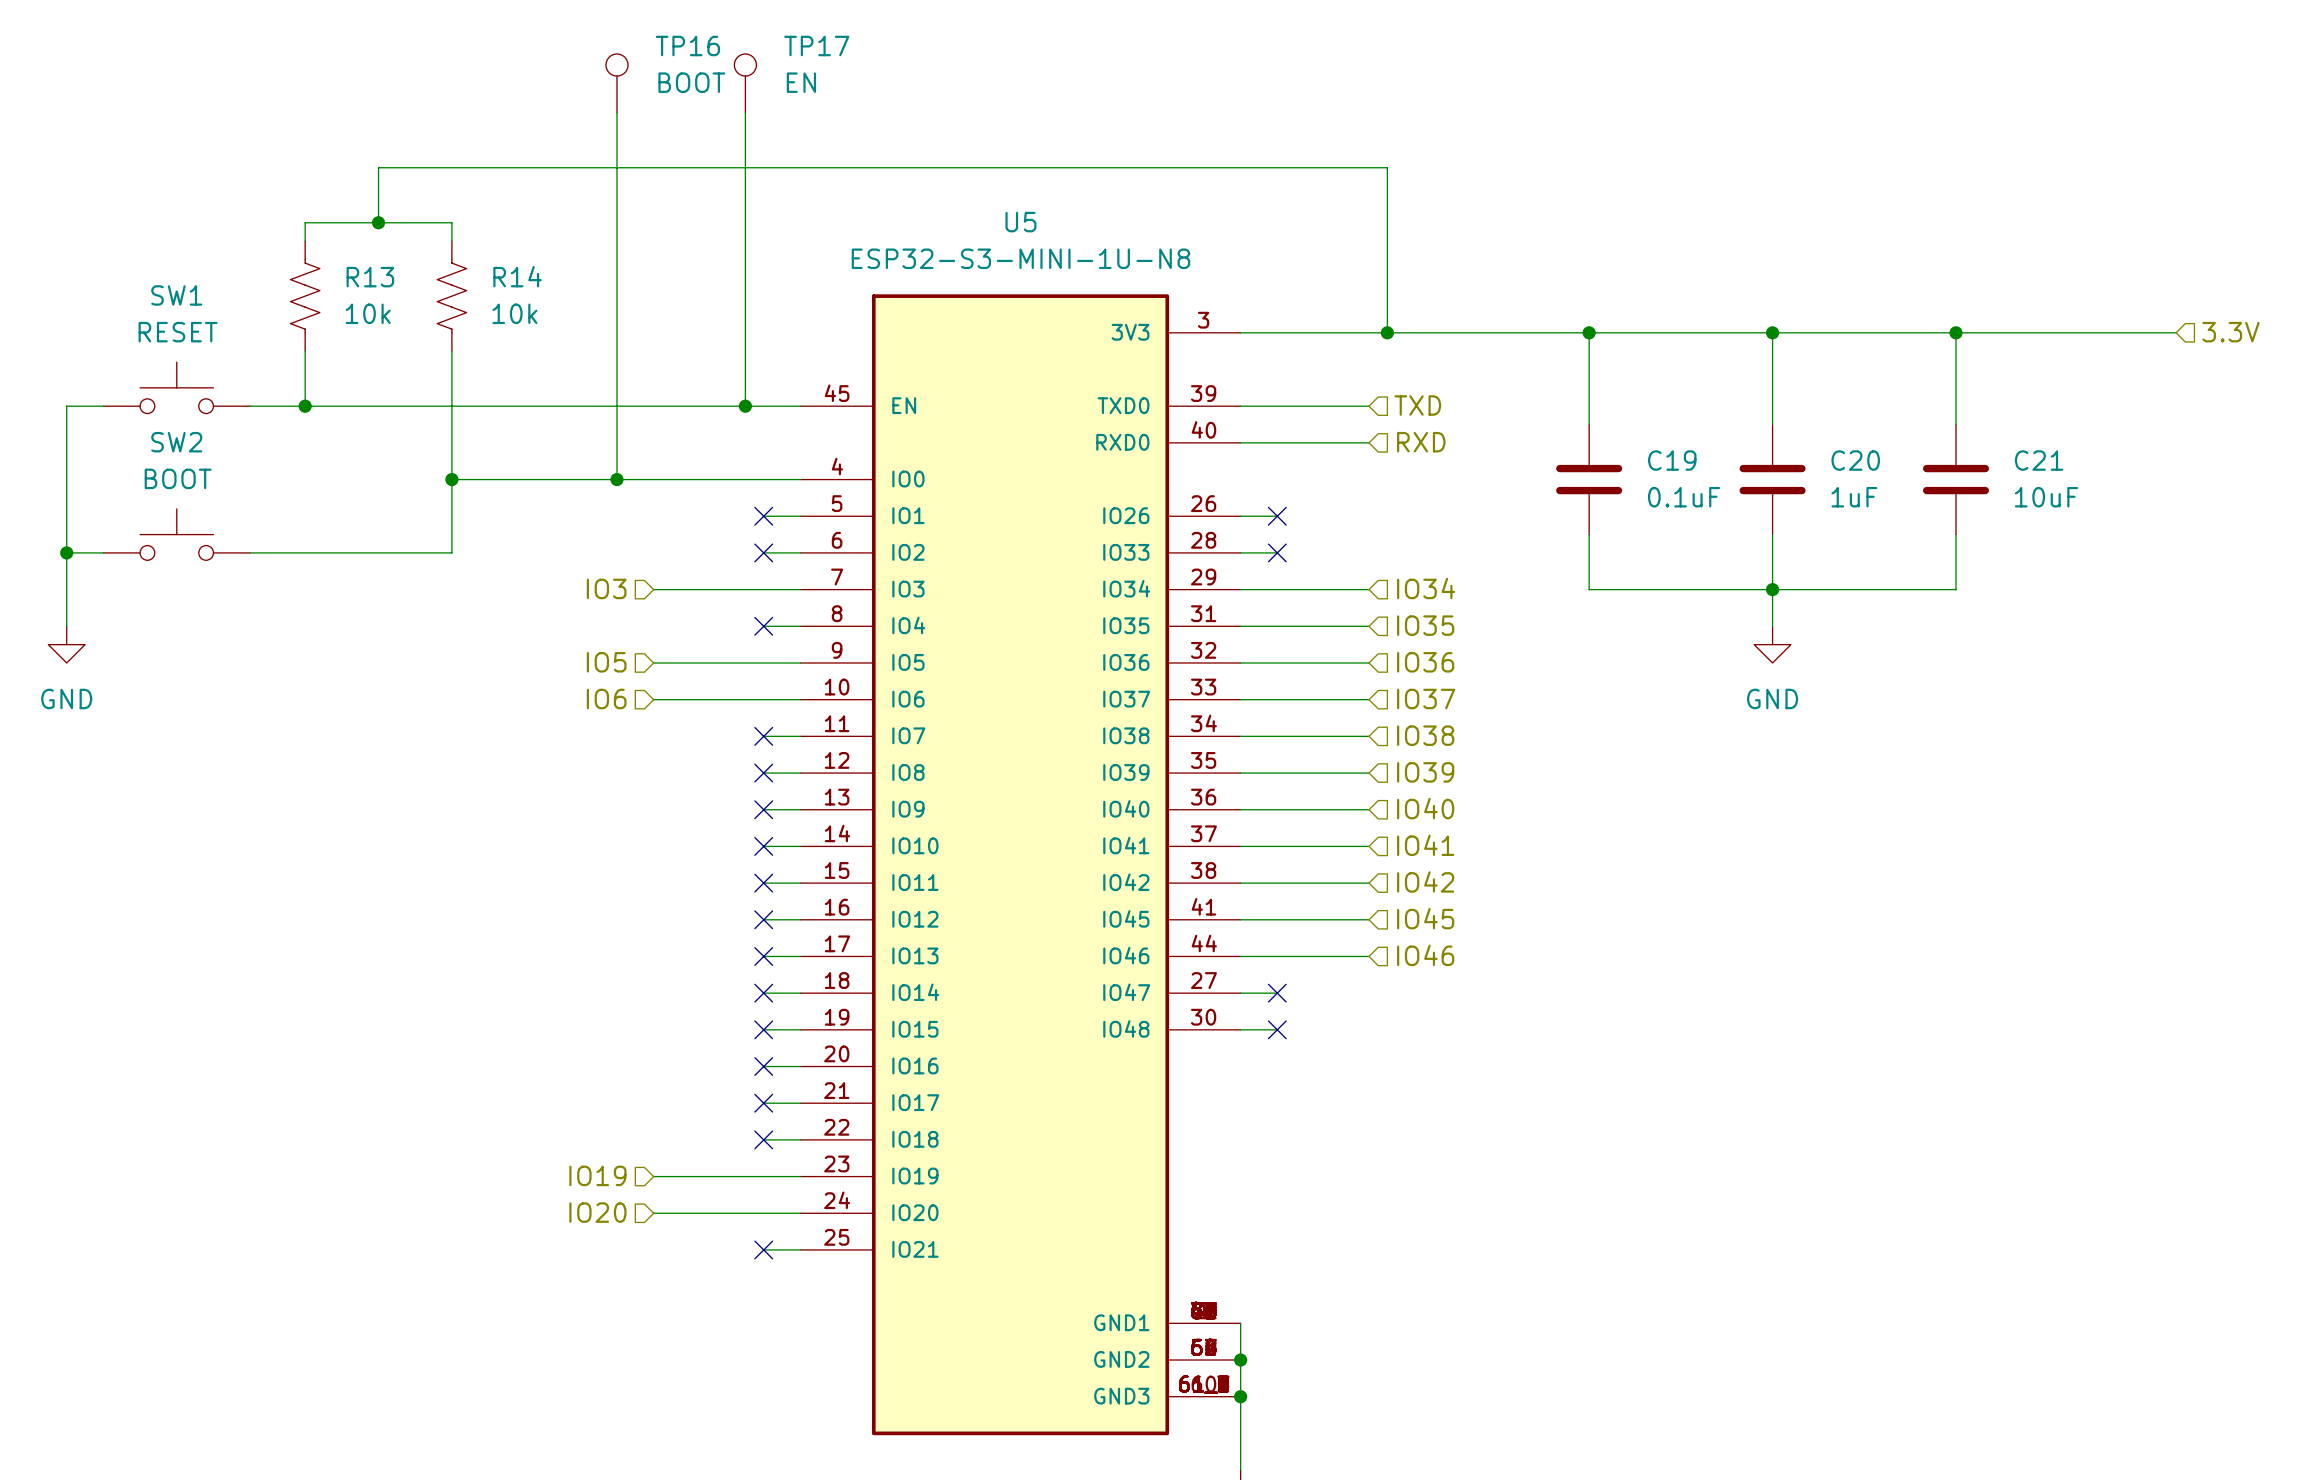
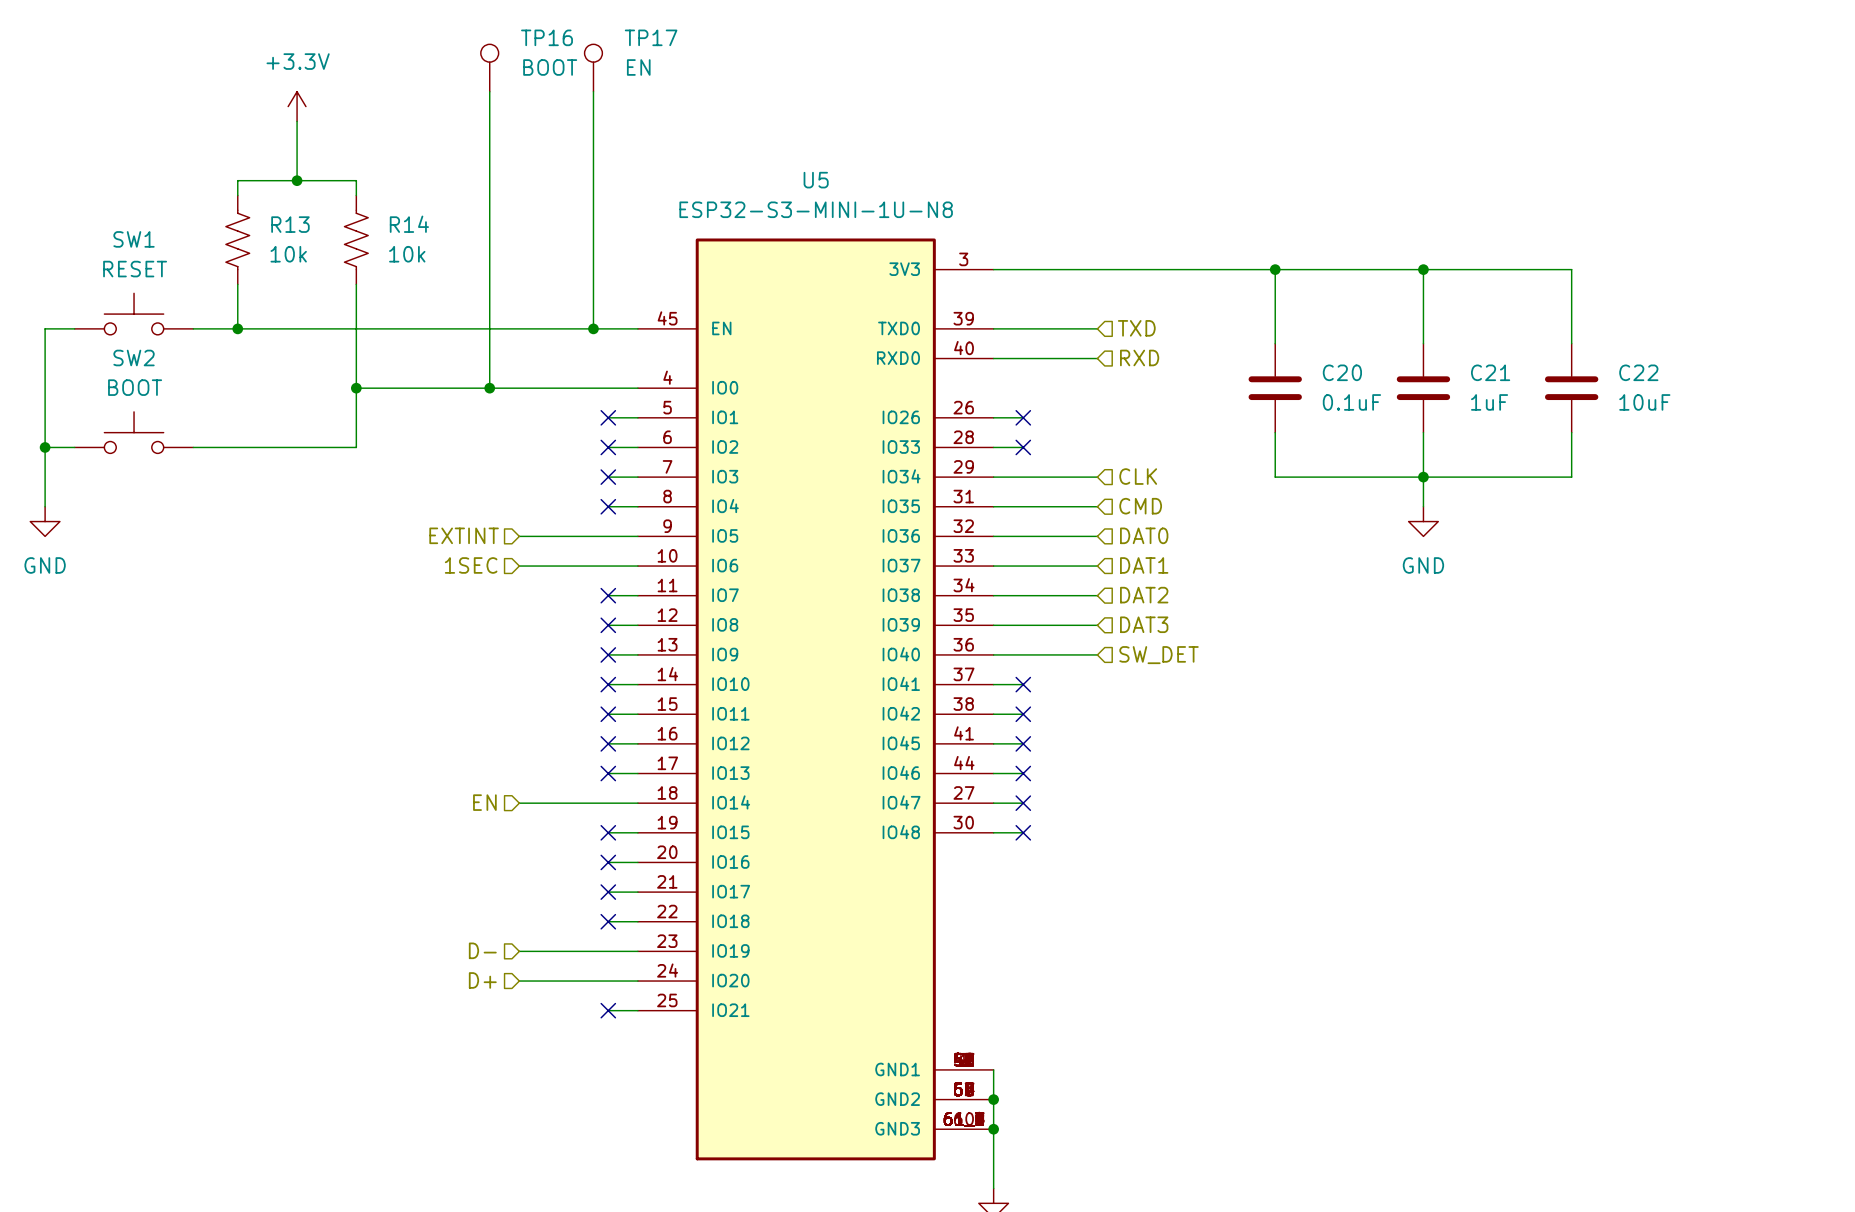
power symbol: none -> +3.3V (297, 106)
wire: (378, 167) (1387, 167) (1387, 332) -> (297, 136) (297, 121)
U5 symbol: [800, 294, 1241, 1436] -> [637, 238, 994, 1161]
junction: (1387, 332) -> none
wire: (1956, 332) (2176, 332) -> none
junction: (1956, 332) -> none
hierarchical label: 3.3V (2230, 332) -> none
C19 name: C19 (1672, 460) -> C20 (1342, 372)
C20 name: C20 (1855, 460) -> C21 (1490, 372)
C21 name: C21 (2039, 460) -> C22 (1638, 372)
hierarchical label: IO3 (606, 588) -> none
hierarchical label: IO34 (1426, 588) -> CLK (1138, 476)
wire: (653, 589) (763, 589) -> none
no-connect mark: none -> (608, 477)
hierarchical label: IO35 (1425, 625) -> CMD (1140, 506)
hierarchical label: IO5 (606, 662) -> EXTINT (464, 535)
hierarchical label: IO36 (1425, 662) -> DAT0 (1144, 535)
hierarchical label: IO6 (606, 698) -> 1SEC (471, 565)
hierarchical label: IO37 (1426, 698) -> DAT1 (1144, 565)
hierarchical label: IO38 (1425, 735) -> DAT2 (1144, 595)
hierarchical label: IO39 (1425, 772) -> DAT3 (1144, 624)
hierarchical label: IO40 (1425, 808) -> SW_DET (1159, 655)
hierarchical label: IO41 (1425, 845) -> none
wire: (1277, 846) (1369, 846) -> none
no-connect mark: none -> (1023, 684)
hierarchical label: IO42 (1425, 881) -> none
wire: (1277, 883) (1369, 883) -> none
no-connect mark: none -> (1023, 714)
hierarchical label: IO45 (1425, 918) -> none
wire: (1277, 919) (1369, 919) -> none
no-connect mark: none -> (1023, 743)
hierarchical label: IO46 (1425, 955) -> none
wire: (1277, 956) (1369, 956) -> none
no-connect mark: none -> (1023, 773)
hierarchical label: none -> EN (484, 802)
wire: none -> (519, 803) (608, 803)
no-connect mark: (763, 993) -> none
hierarchical label: IO19 (597, 1175) -> D- (482, 950)
hierarchical label: IO20 (597, 1212) -> D+ (482, 980)

